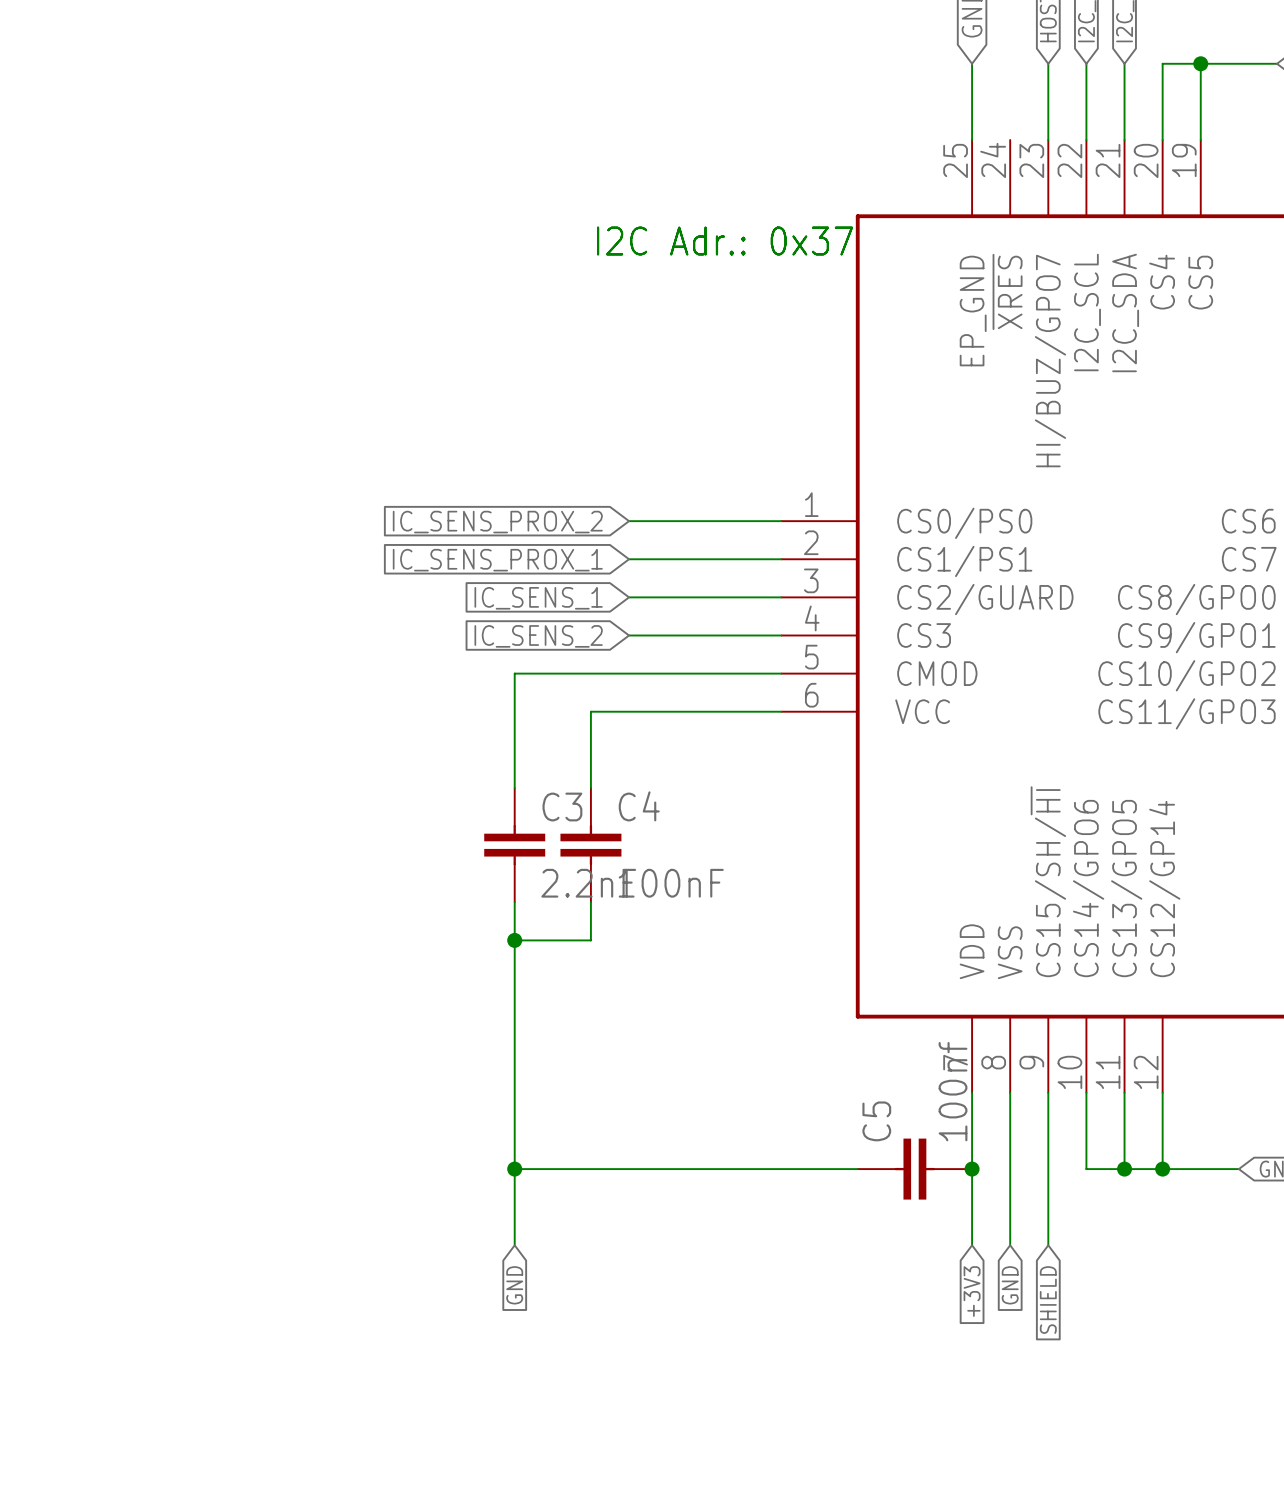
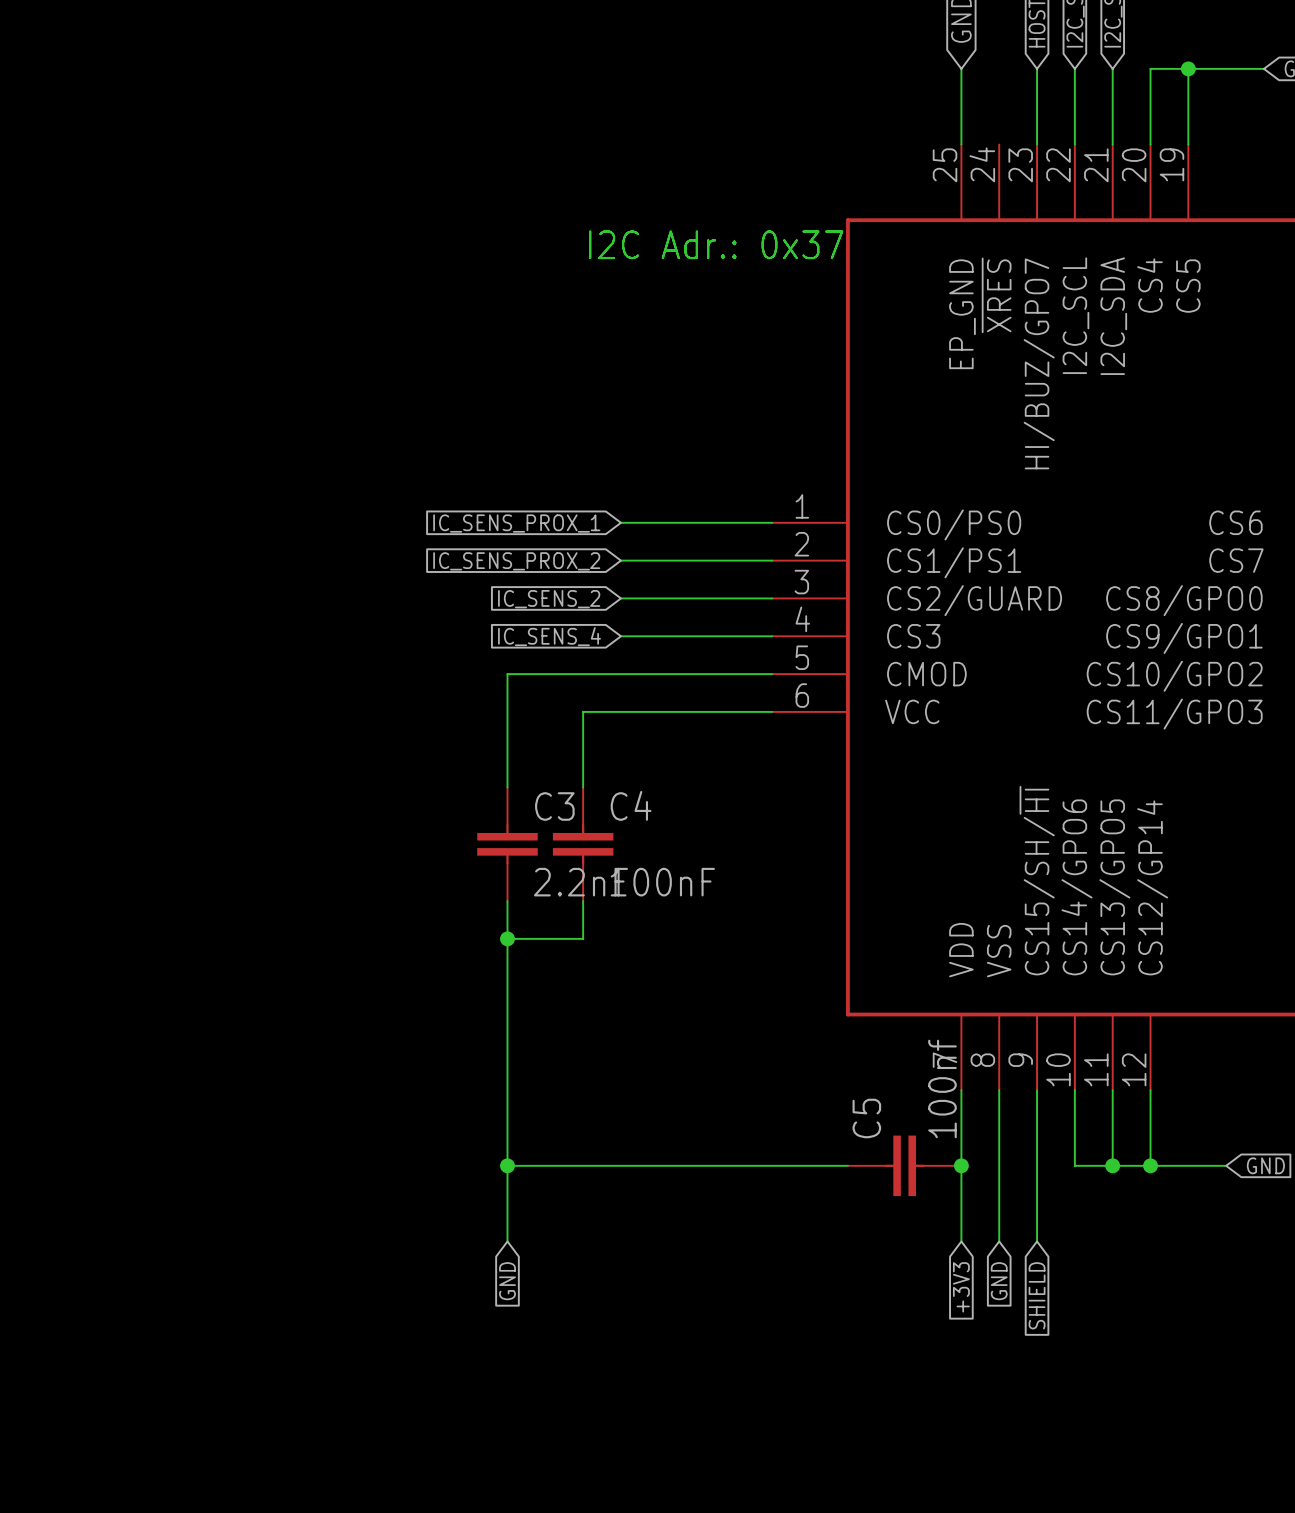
global label: IC_SENS_PROX_2 (497, 522) -> IC_SENS_PROX_1 (516, 523)
global label: IC_SENS_PROX_1 (497, 560) -> IC_SENS_PROX_2 (516, 561)
global label: IC_SENS_1 (538, 598) -> IC_SENS_2 (549, 599)
global label: IC_SENS_2 (538, 636) -> IC_SENS_4 (549, 636)

